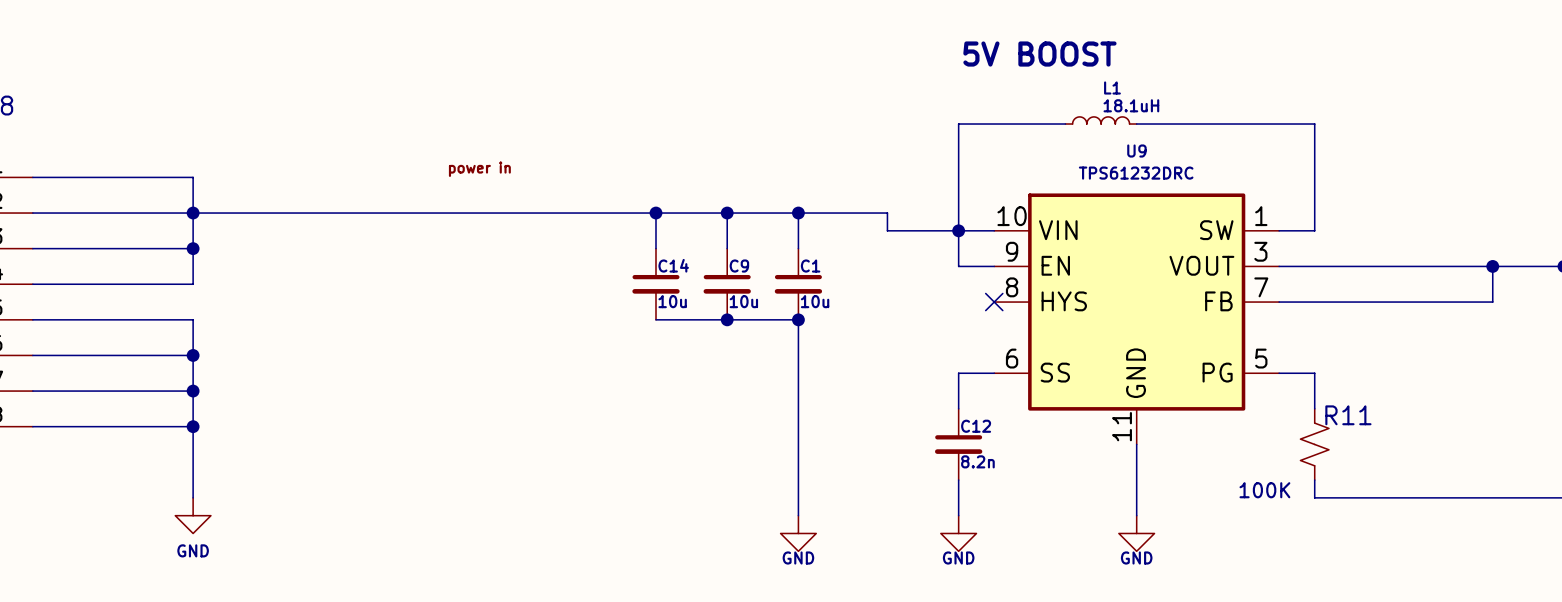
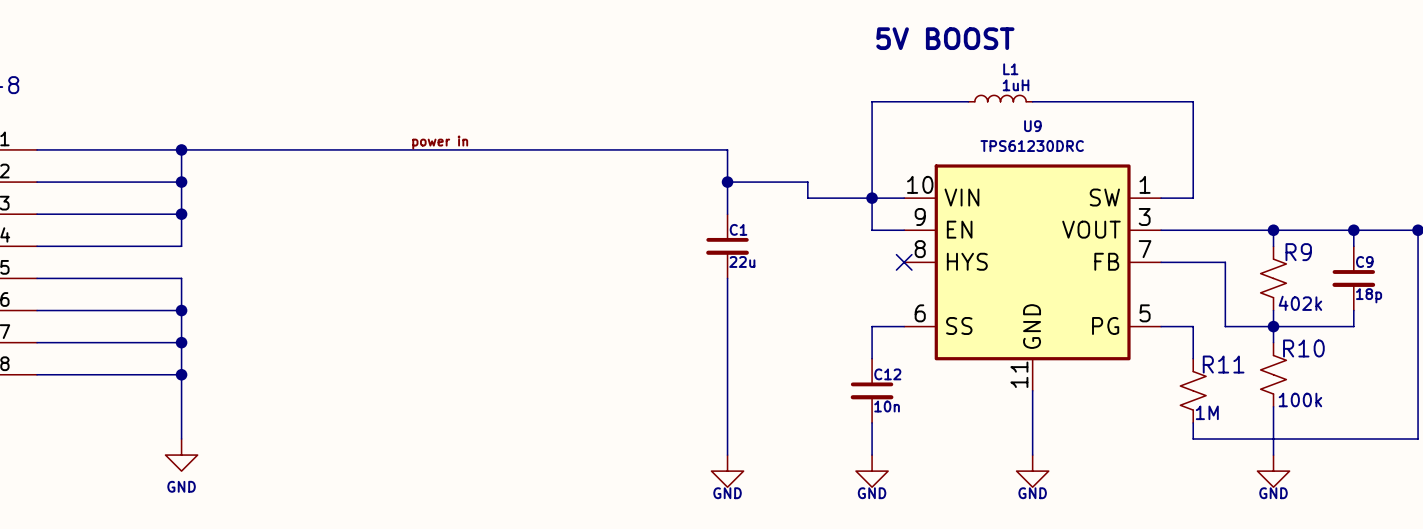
L1 value: 18.1uH (1131, 105) -> 1uH (1016, 85)
U9 value: TPS61232DRC (1136, 173) -> TPS61230DRC (1032, 146)
junction: none -> (181, 149)
wire: (193, 213) (798, 213) -> (181, 149) (727, 149) (727, 182)
wire: (656, 213) (656, 248) -> none
junction: (656, 213) -> none
wire: (727, 213) (727, 248) -> none
junction: (727, 213) -> none
wire: none -> (1273, 230) (1273, 246)
junction: none -> (1273, 230)
C14: 10u (656, 284) -> none
C9 position: (727, 284) -> (1353, 278)
wire: (1492, 284) (1492, 302) (1350, 302) -> (1353, 310) (1353, 326) (1225, 326) (1225, 262)
C9 value: 10u (743, 301) -> 18p (1369, 295)
C1 value: 10u (815, 301) -> 22u (742, 261)
wire: (656, 319) (798, 319) -> none
junction: (727, 319) -> none
junction: (798, 319) -> none
R9: none -> 402k (1273, 278)
wire: none -> (1273, 310) (1273, 342)
junction: none -> (1273, 326)
R10: none -> 100k (1273, 374)
C12 value: 8.2n (977, 461) -> 10n (887, 406)
wire: none -> (1273, 406) (1273, 455)
R11 value: 100K (1264, 490) -> 1M (1207, 412)
power symbol: none -> GND (1273, 471)

